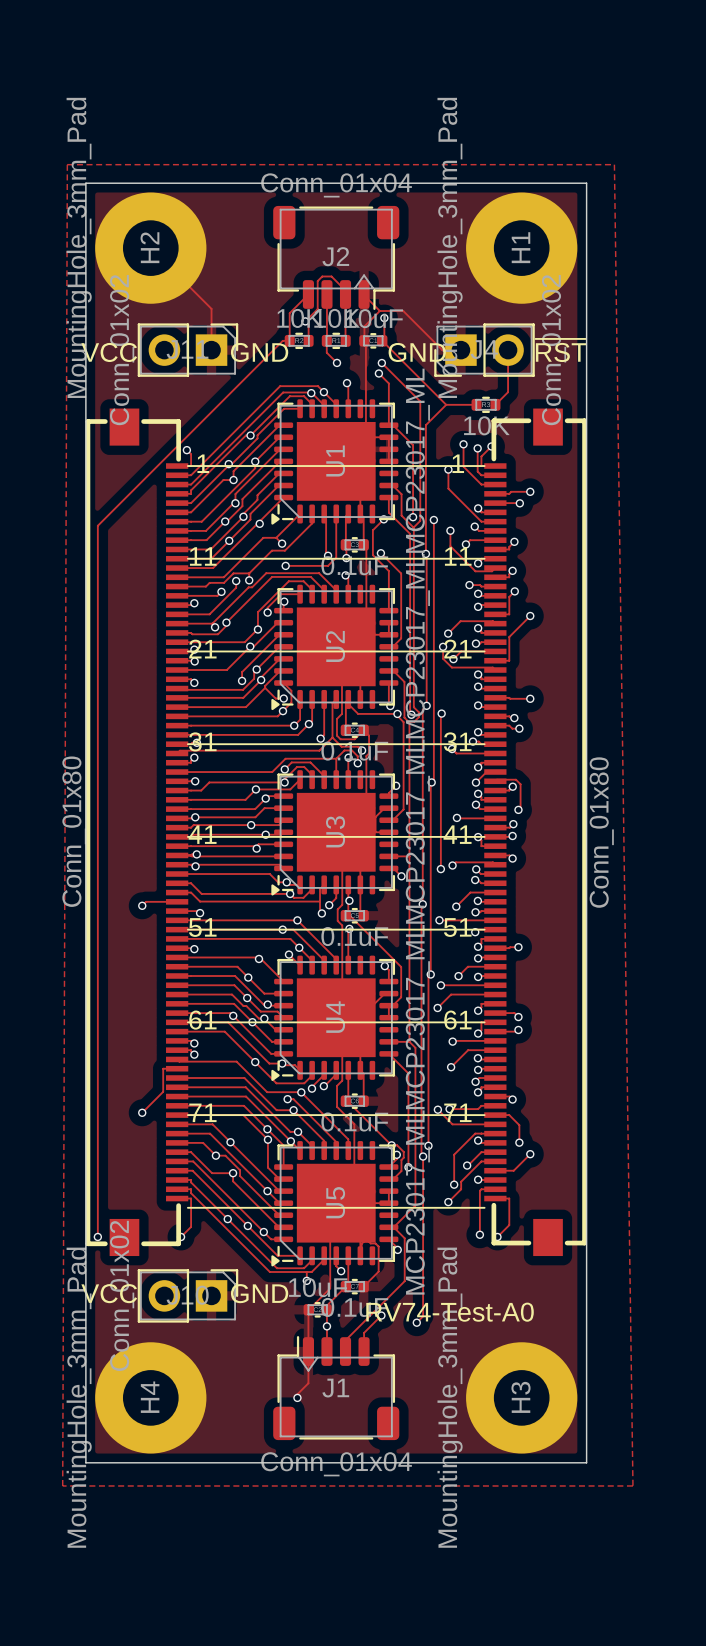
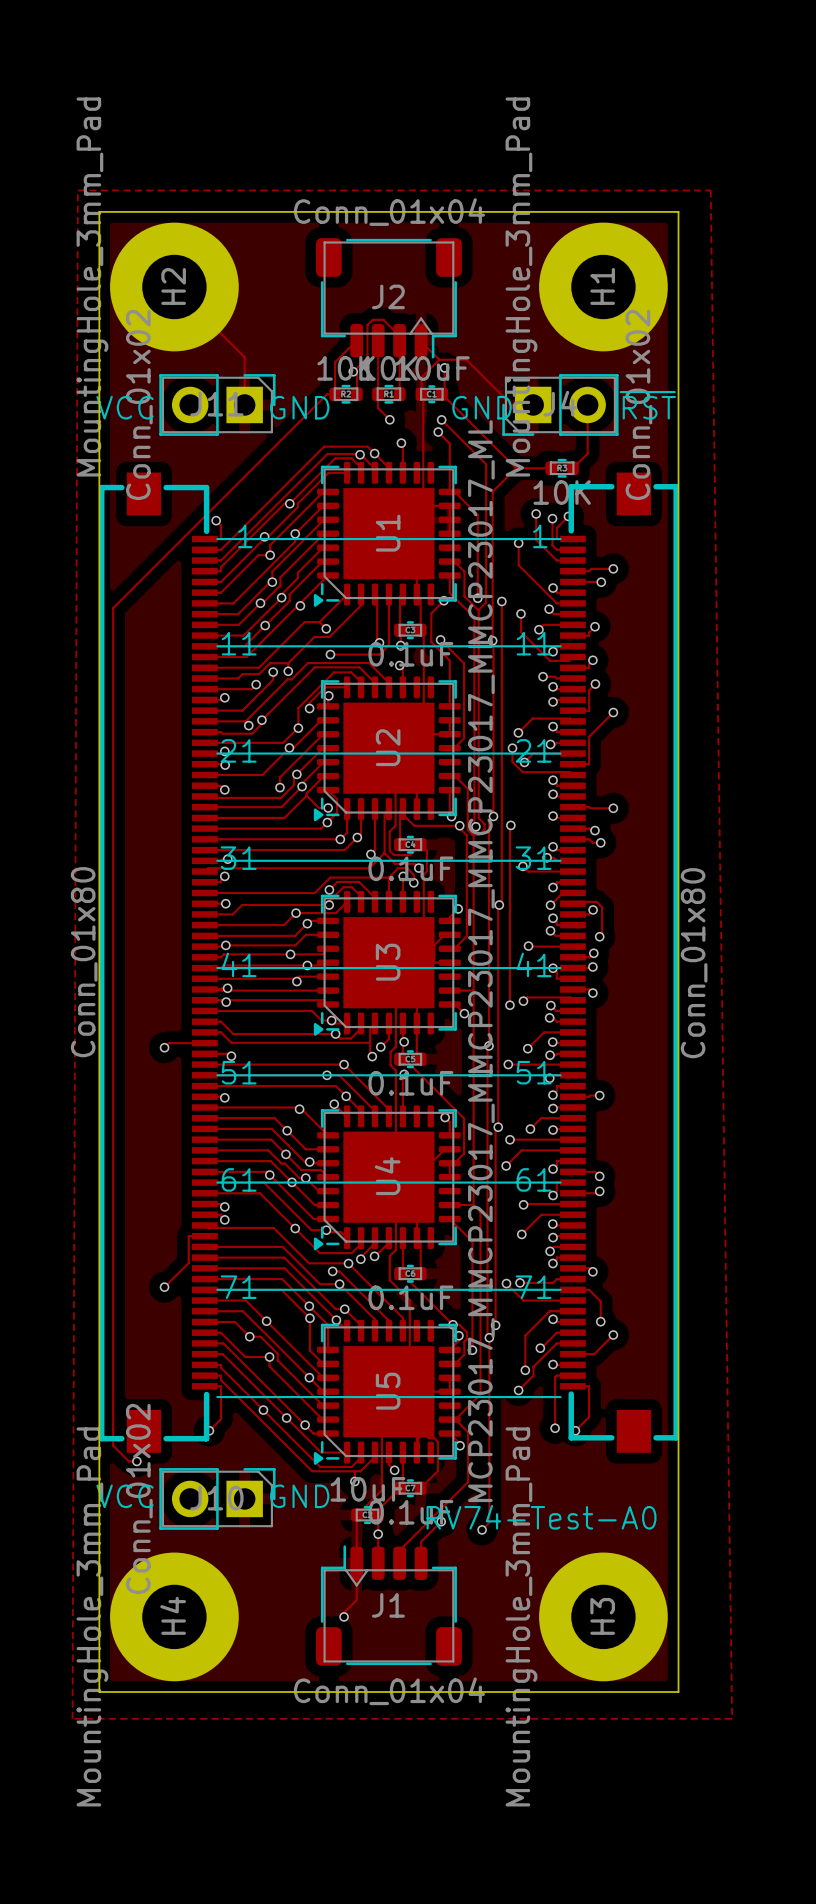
track: none -> (113, 1430) (113, 1445) (128, 1461) (136, 1461)
via position: (97, 1236) -> (136, 1461)

